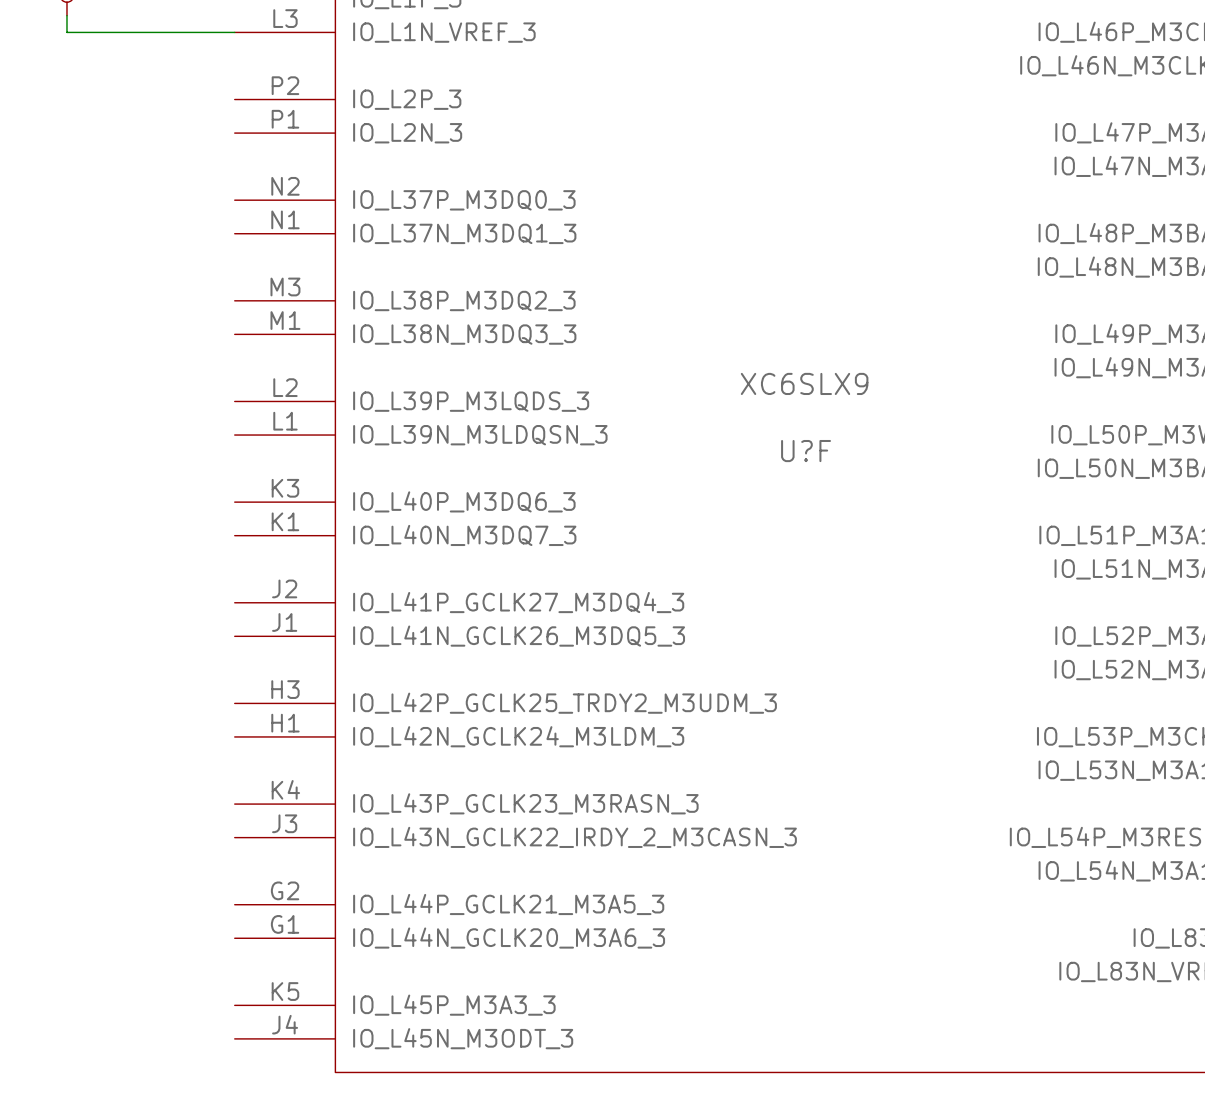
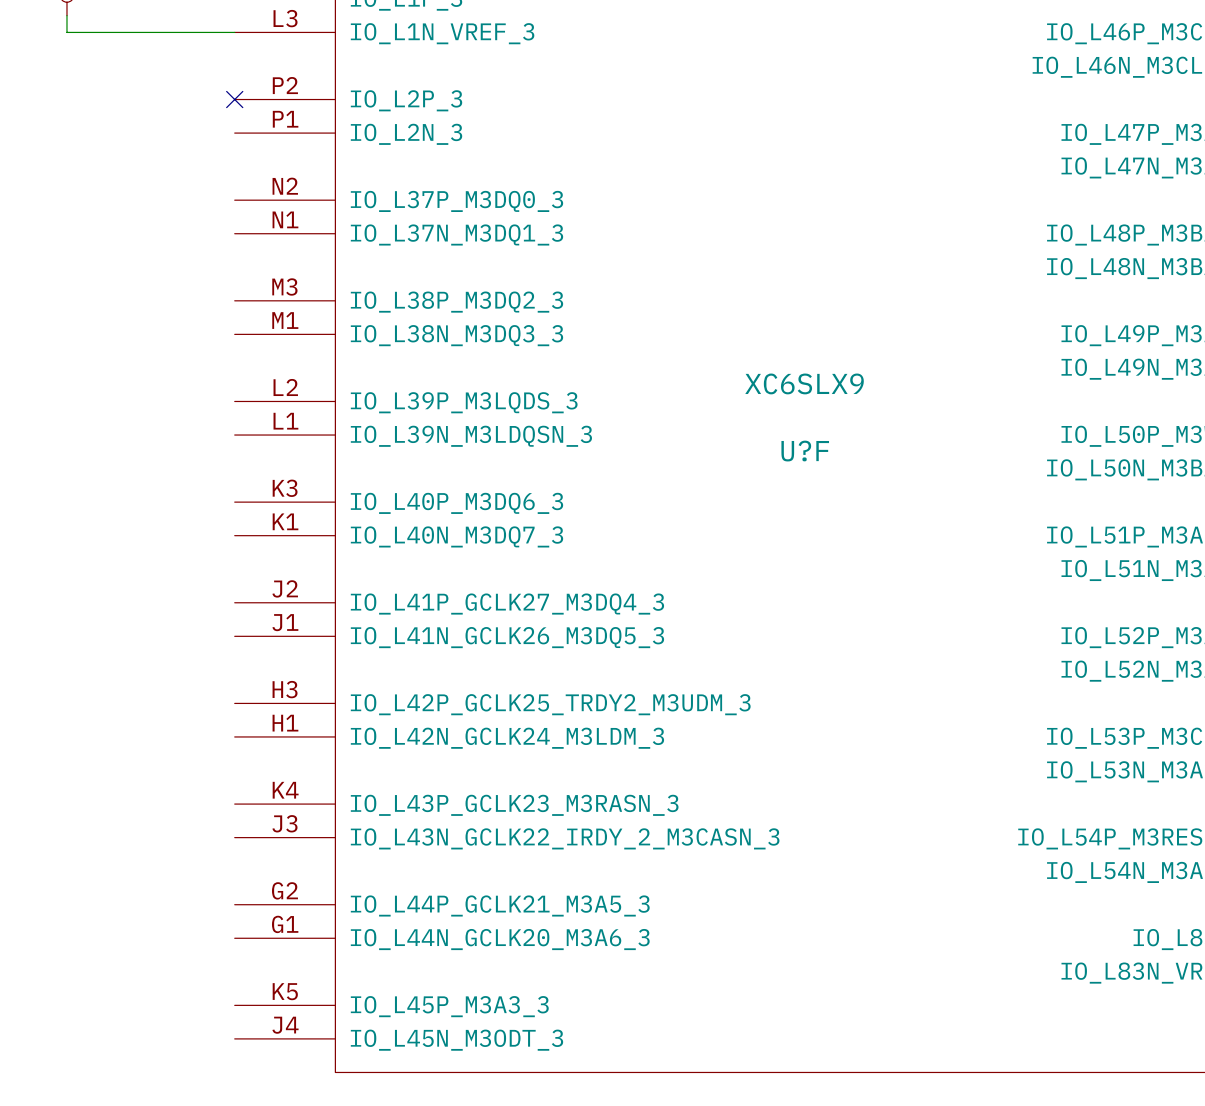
no-connect mark: none -> (234, 99)

